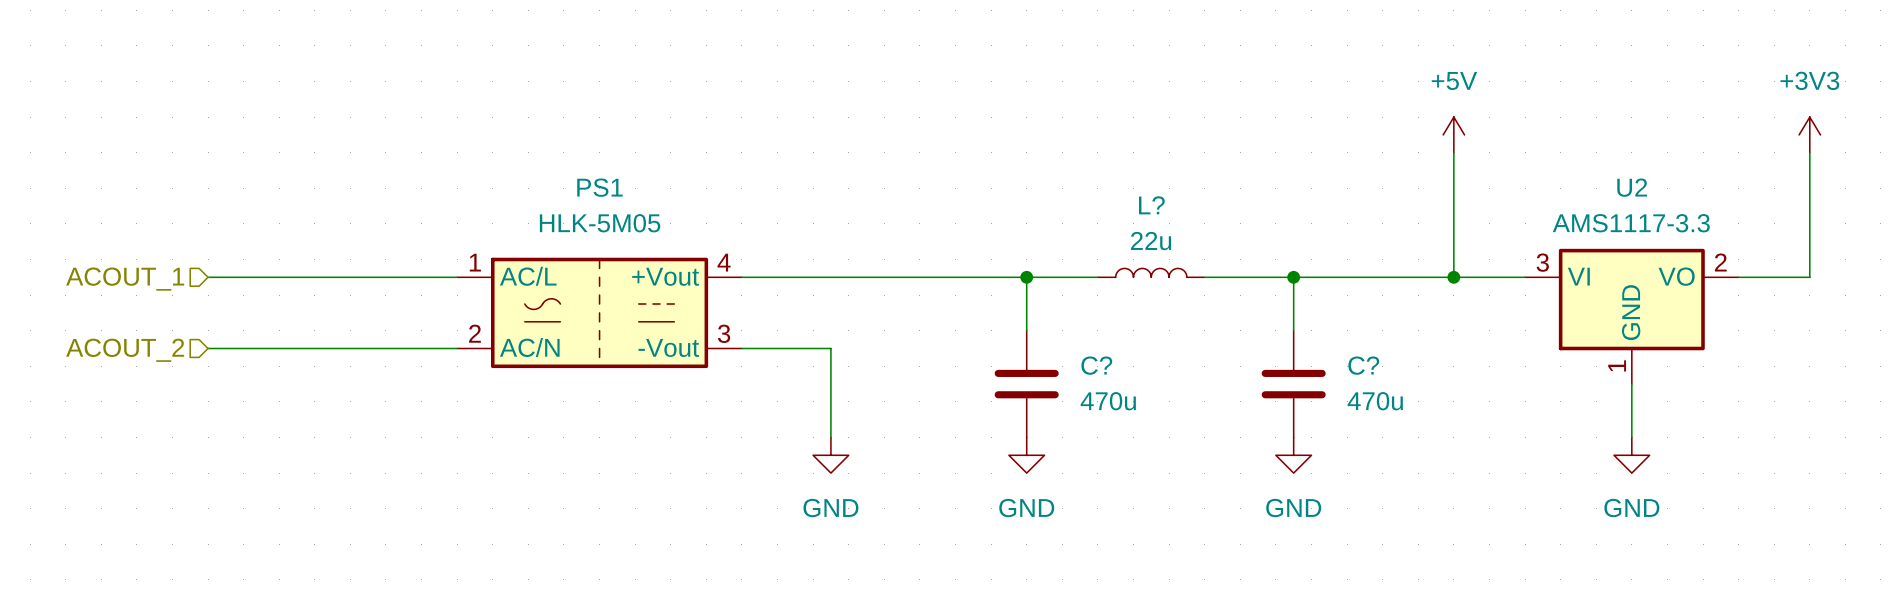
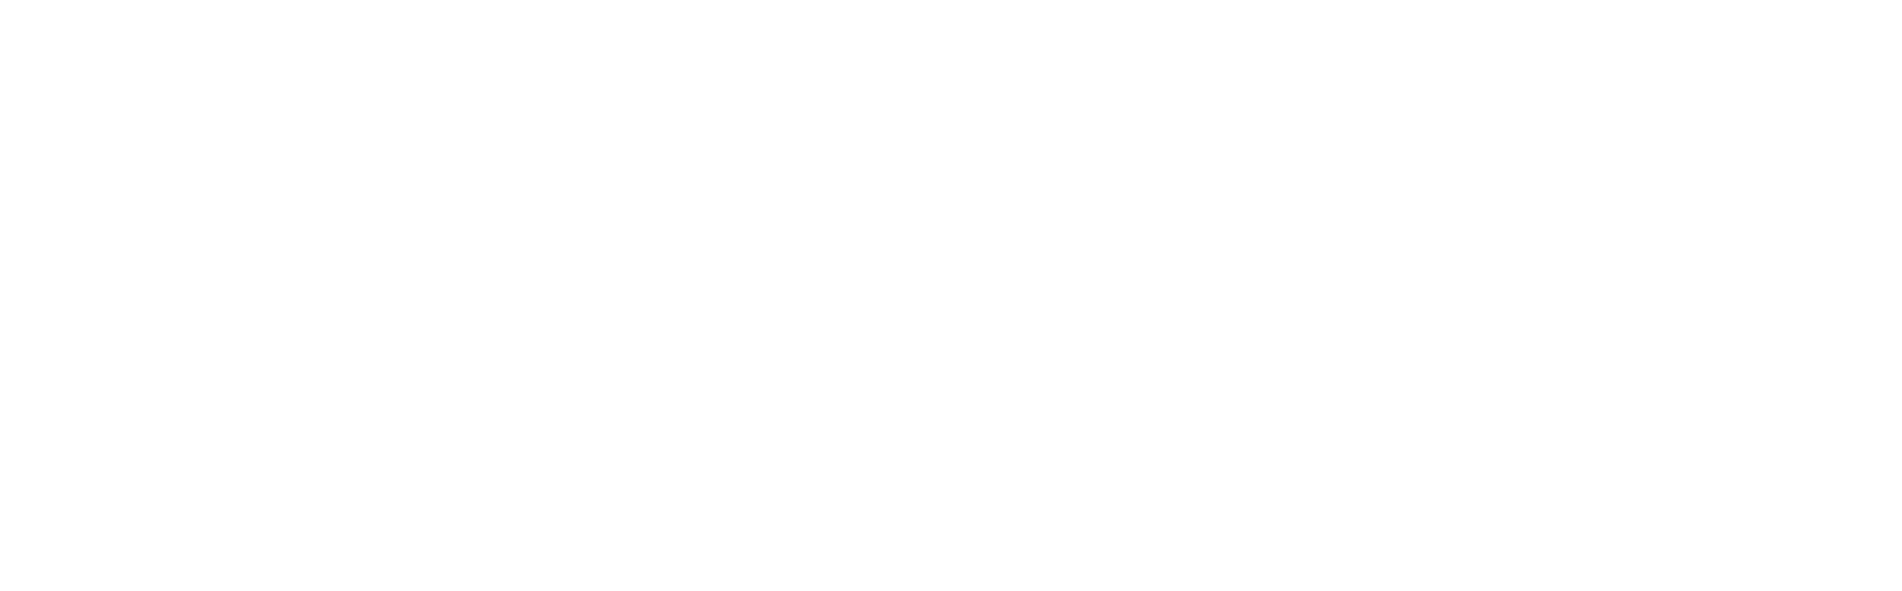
power symbol: +5V (1453, 134) -> none
power symbol: +3V3 (1809, 134) -> none
wire: (1453, 152) (1453, 277) -> none
wire: (1809, 152) (1809, 277) (1738, 277) -> none
L?: 22u (1151, 272) -> none
wire: (208, 277) (457, 277) -> none
wire: (741, 277) (1097, 277) -> none
wire: (1026, 277) (1026, 330) -> none
junction: (1026, 277) -> none
wire: (1204, 277) (1525, 277) -> none
wire: (1293, 277) (1293, 330) -> none
junction: (1293, 277) -> none
junction: (1453, 277) -> none
hierarchical label: ACOUT_1 (125, 279) -> none
PS1: HLK-5M05 (599, 312) -> none
U2: AMS1117-3.3 (1631, 316) -> none
wire: (208, 348) (457, 348) -> none
wire: (741, 348) (830, 348) (830, 437) -> none
hierarchical label: ACOUT_2 (125, 350) -> none
C?: 470u (1026, 384) -> none
C?: 470u (1293, 384) -> none
wire: (1631, 384) (1631, 437) -> none
power symbol: GND (830, 455) -> none
power symbol: GND (1026, 455) -> none
power symbol: GND (1293, 455) -> none
power symbol: GND (1631, 455) -> none

